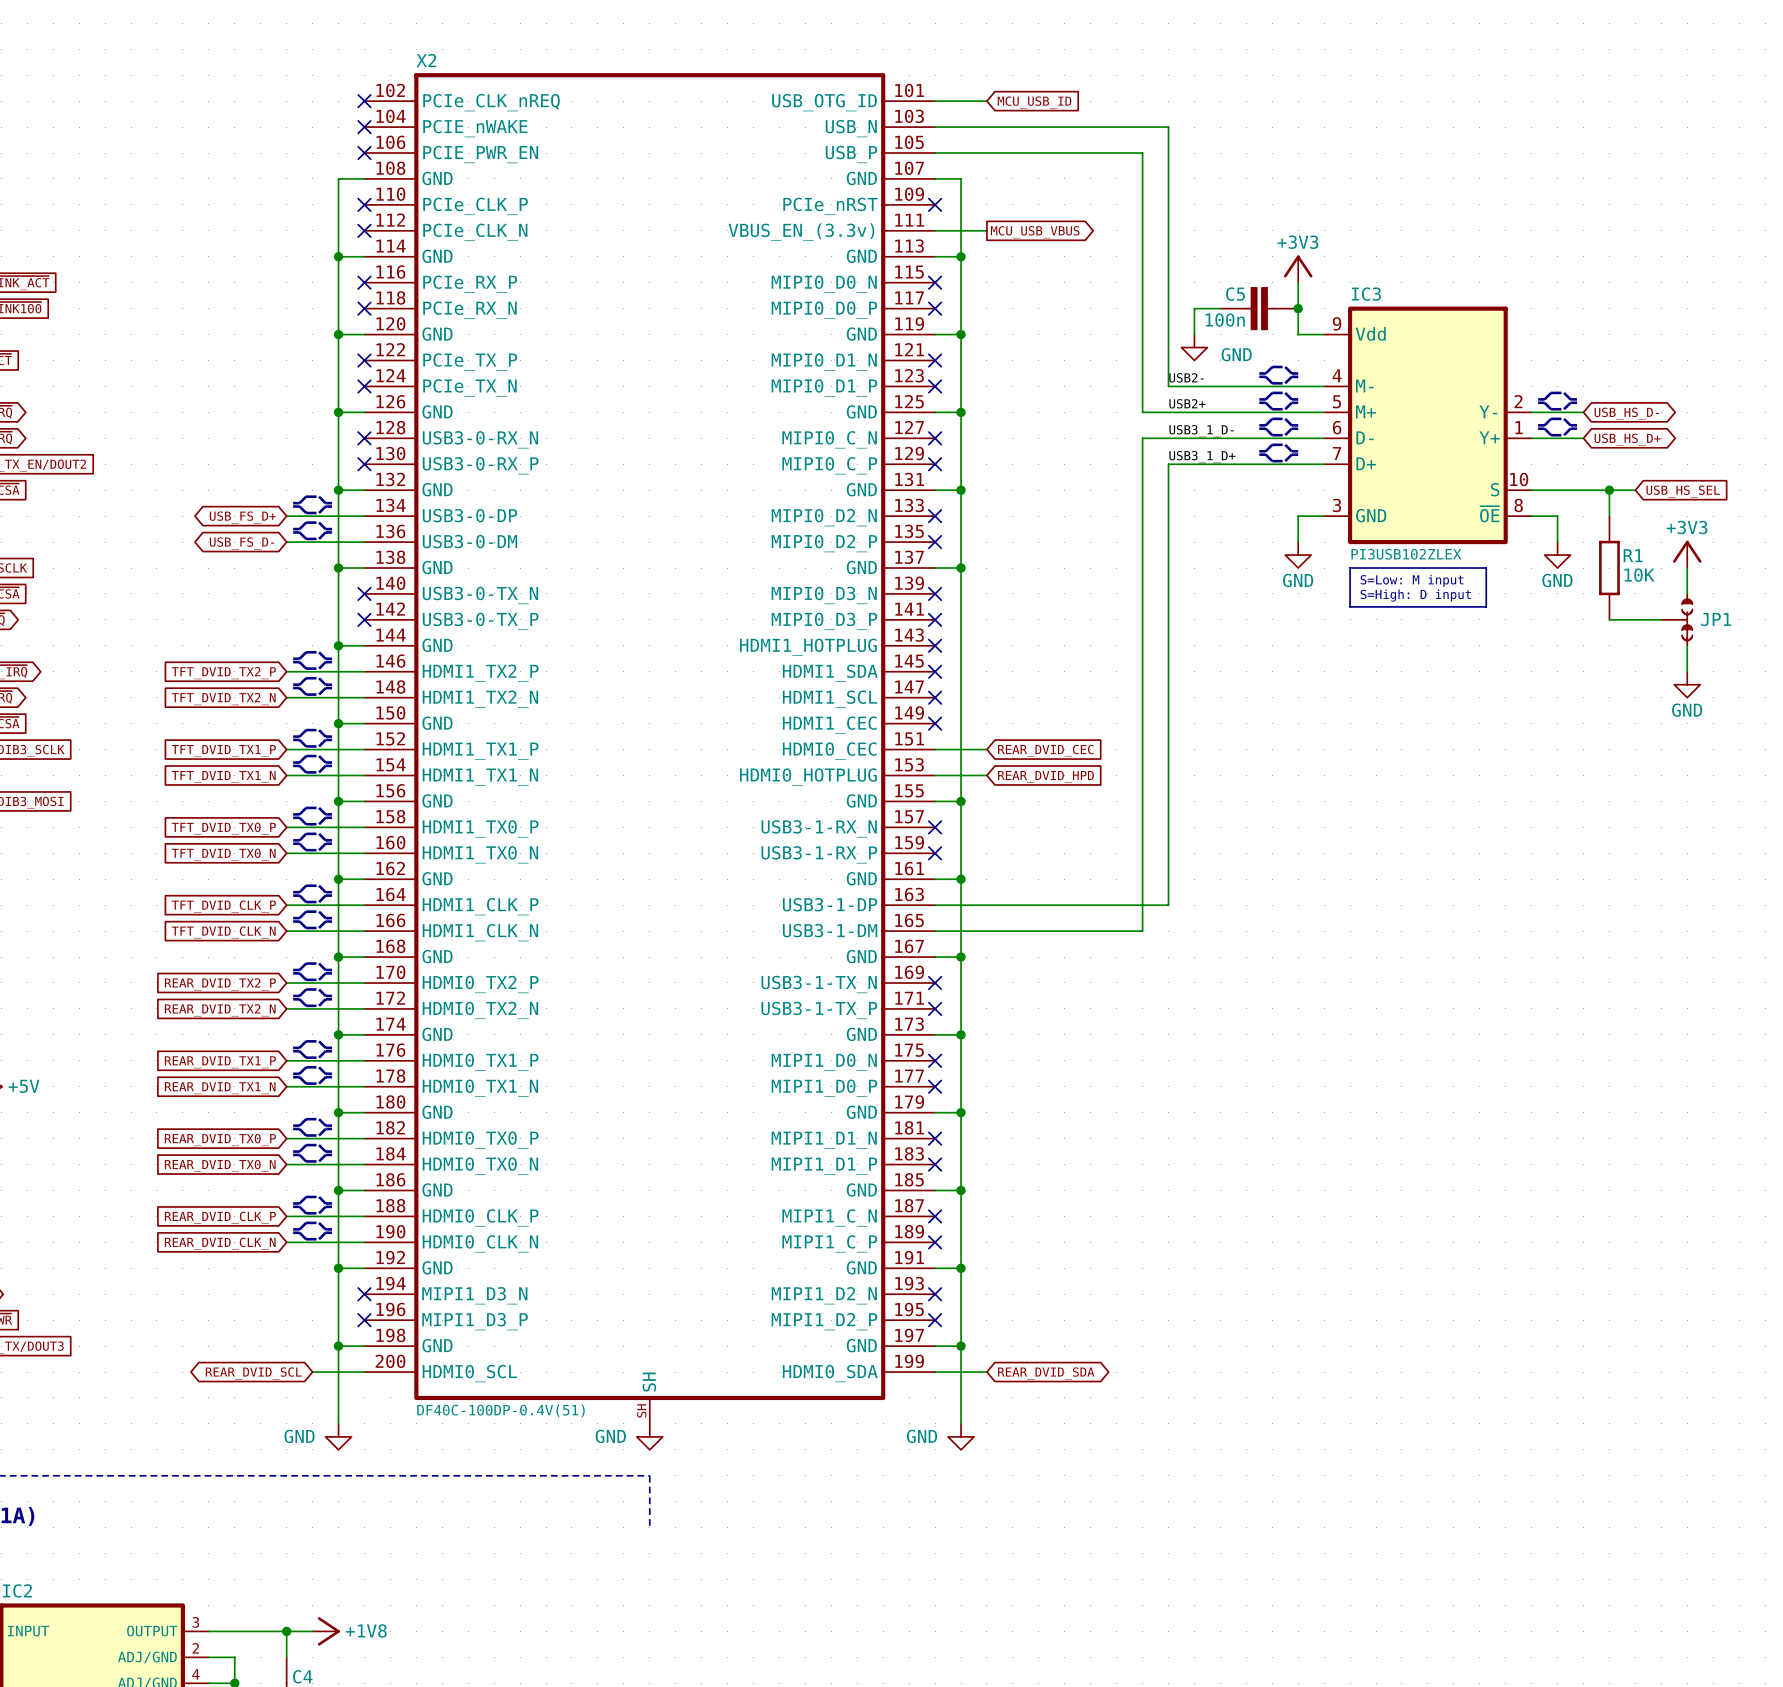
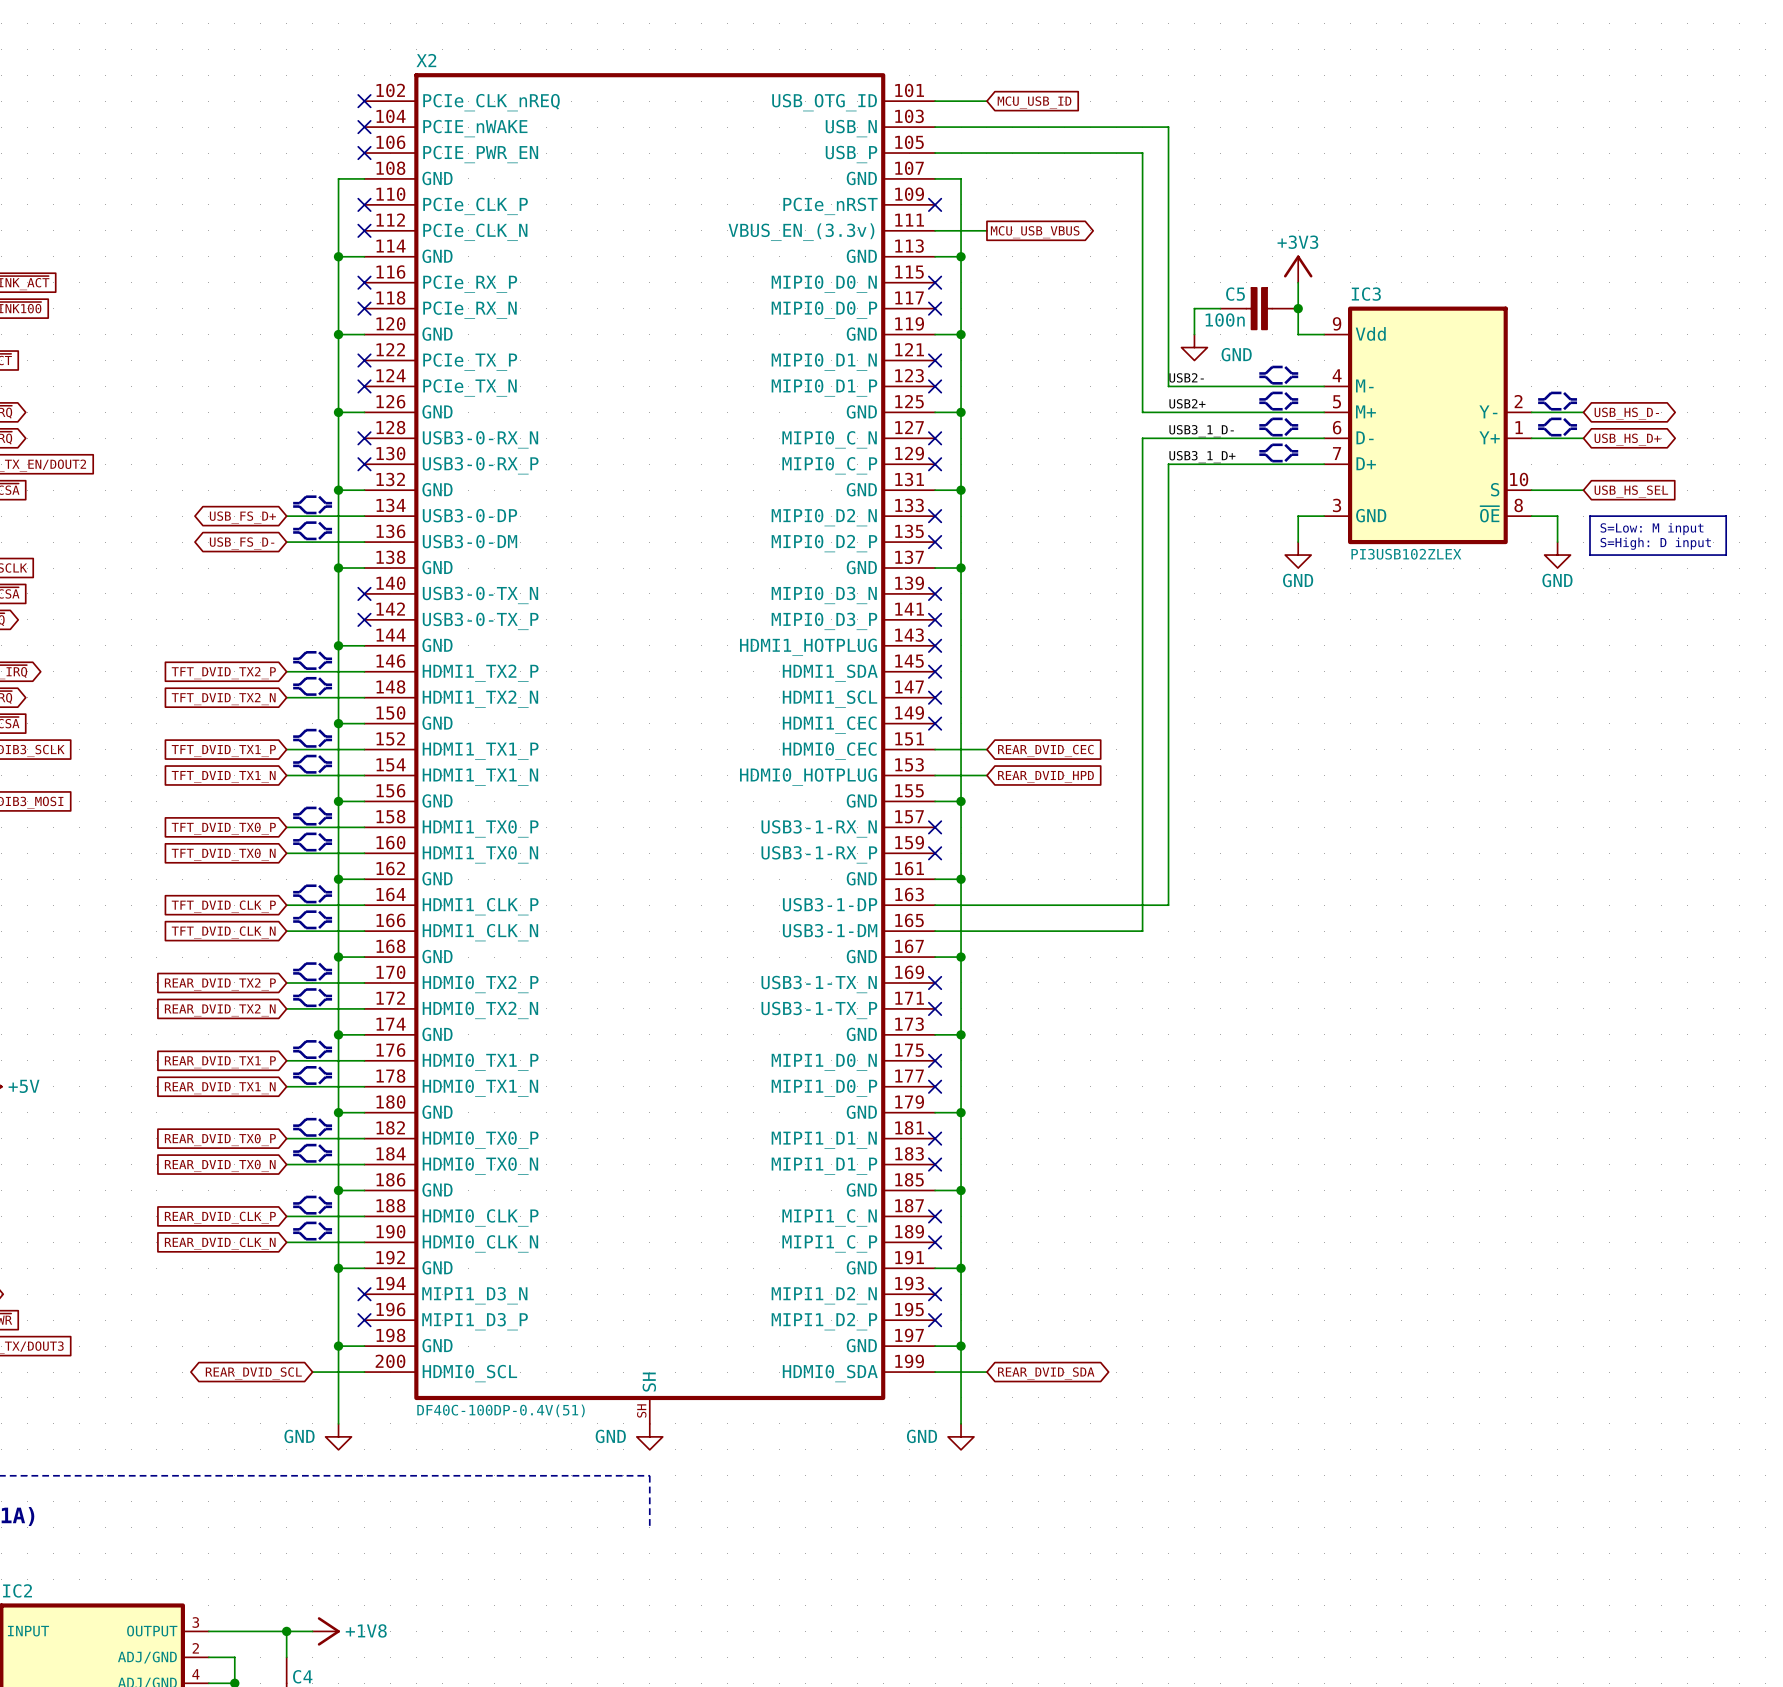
wire: (1583, 490) (1635, 490) -> none
wire: (1609, 490) (1609, 516) -> none
junction: (1609, 490) -> none
global label position: USB_HS_SEL (1683, 491) -> USB_HS_SEL (1631, 491)
power symbol: +3V3 (1687, 554) -> none
line: (1350, 568) (1486, 568) (1486, 606) (1350, 606) (1350, 568) -> (1589, 516) (1726, 516) (1726, 555) (1589, 555) (1589, 516)
R1: 10K (1609, 568) -> none
wire: (1687, 568) (1687, 593) -> none
text position: S=Low: M input (1412, 580) -> S=Low: M input (1652, 529)
text position: S=High: D input (1415, 595) -> S=High: D input (1655, 543)
wire: (1609, 619) (1661, 619) -> none
JP1: (1676, 619) -> none
wire: (1687, 645) (1687, 671) -> none
power symbol: GND (1687, 684) -> none

